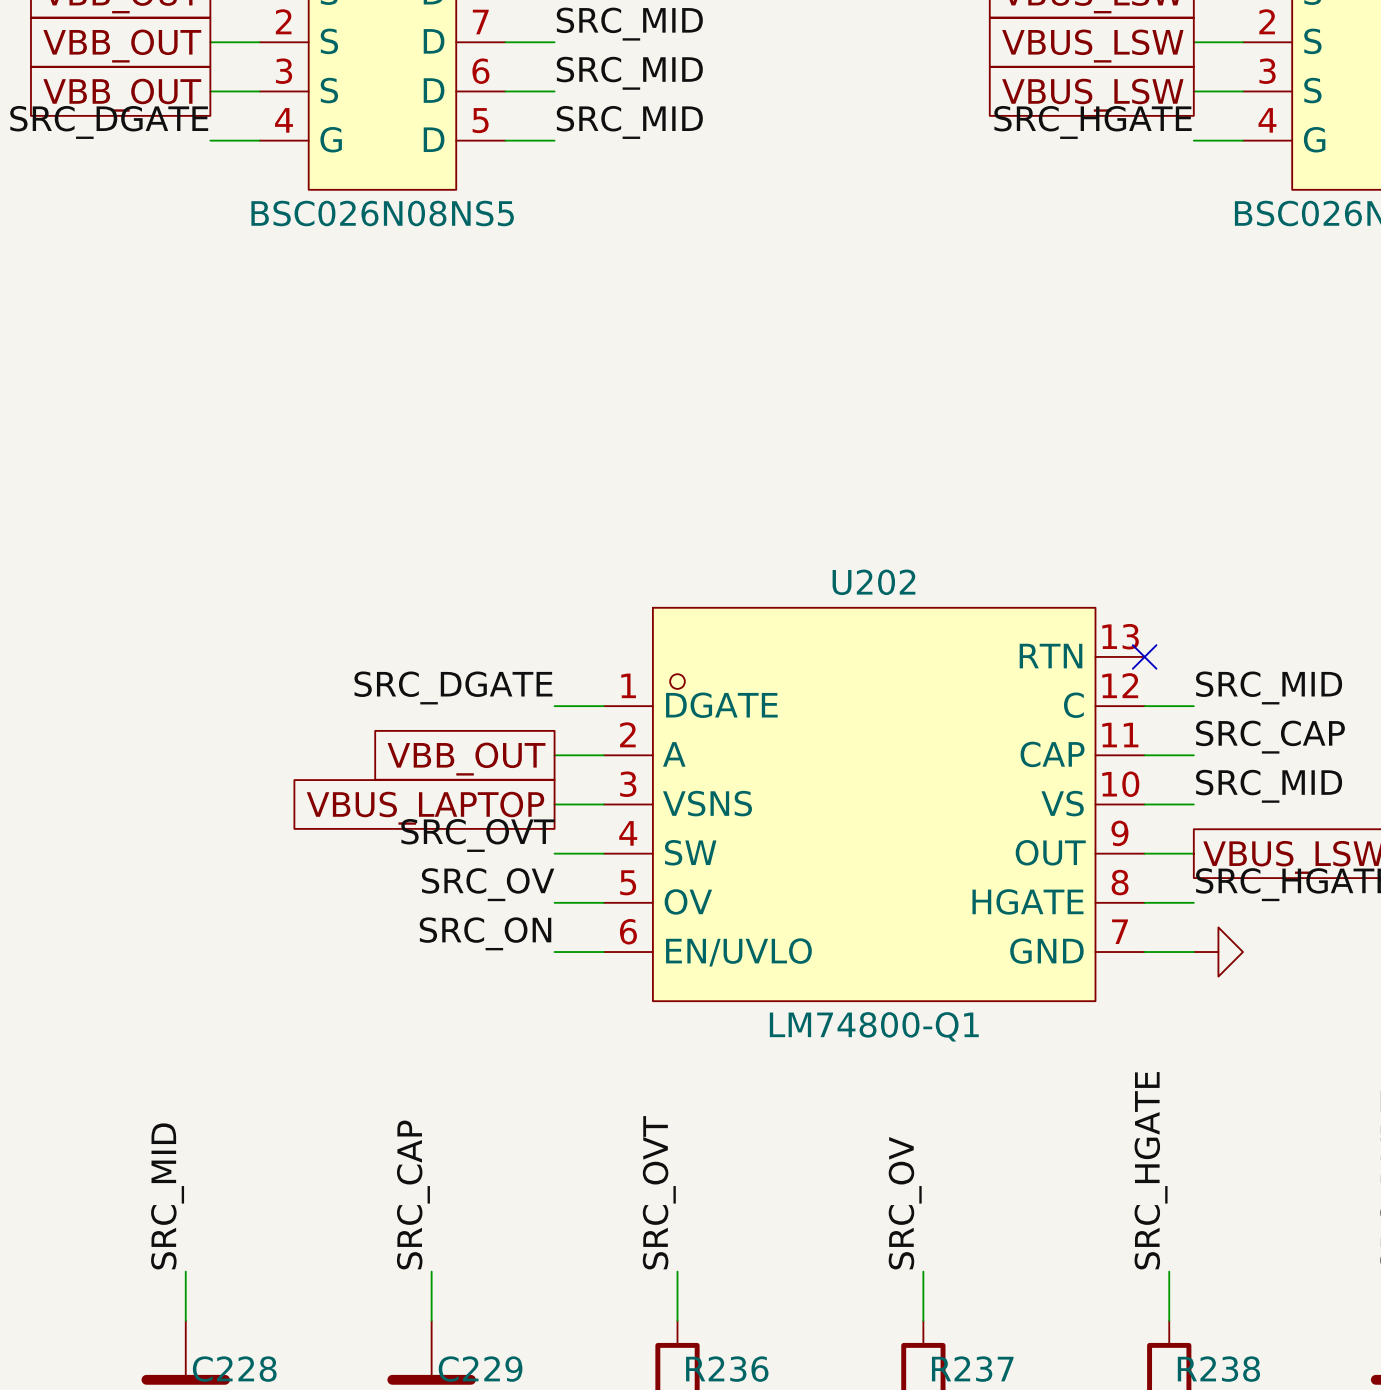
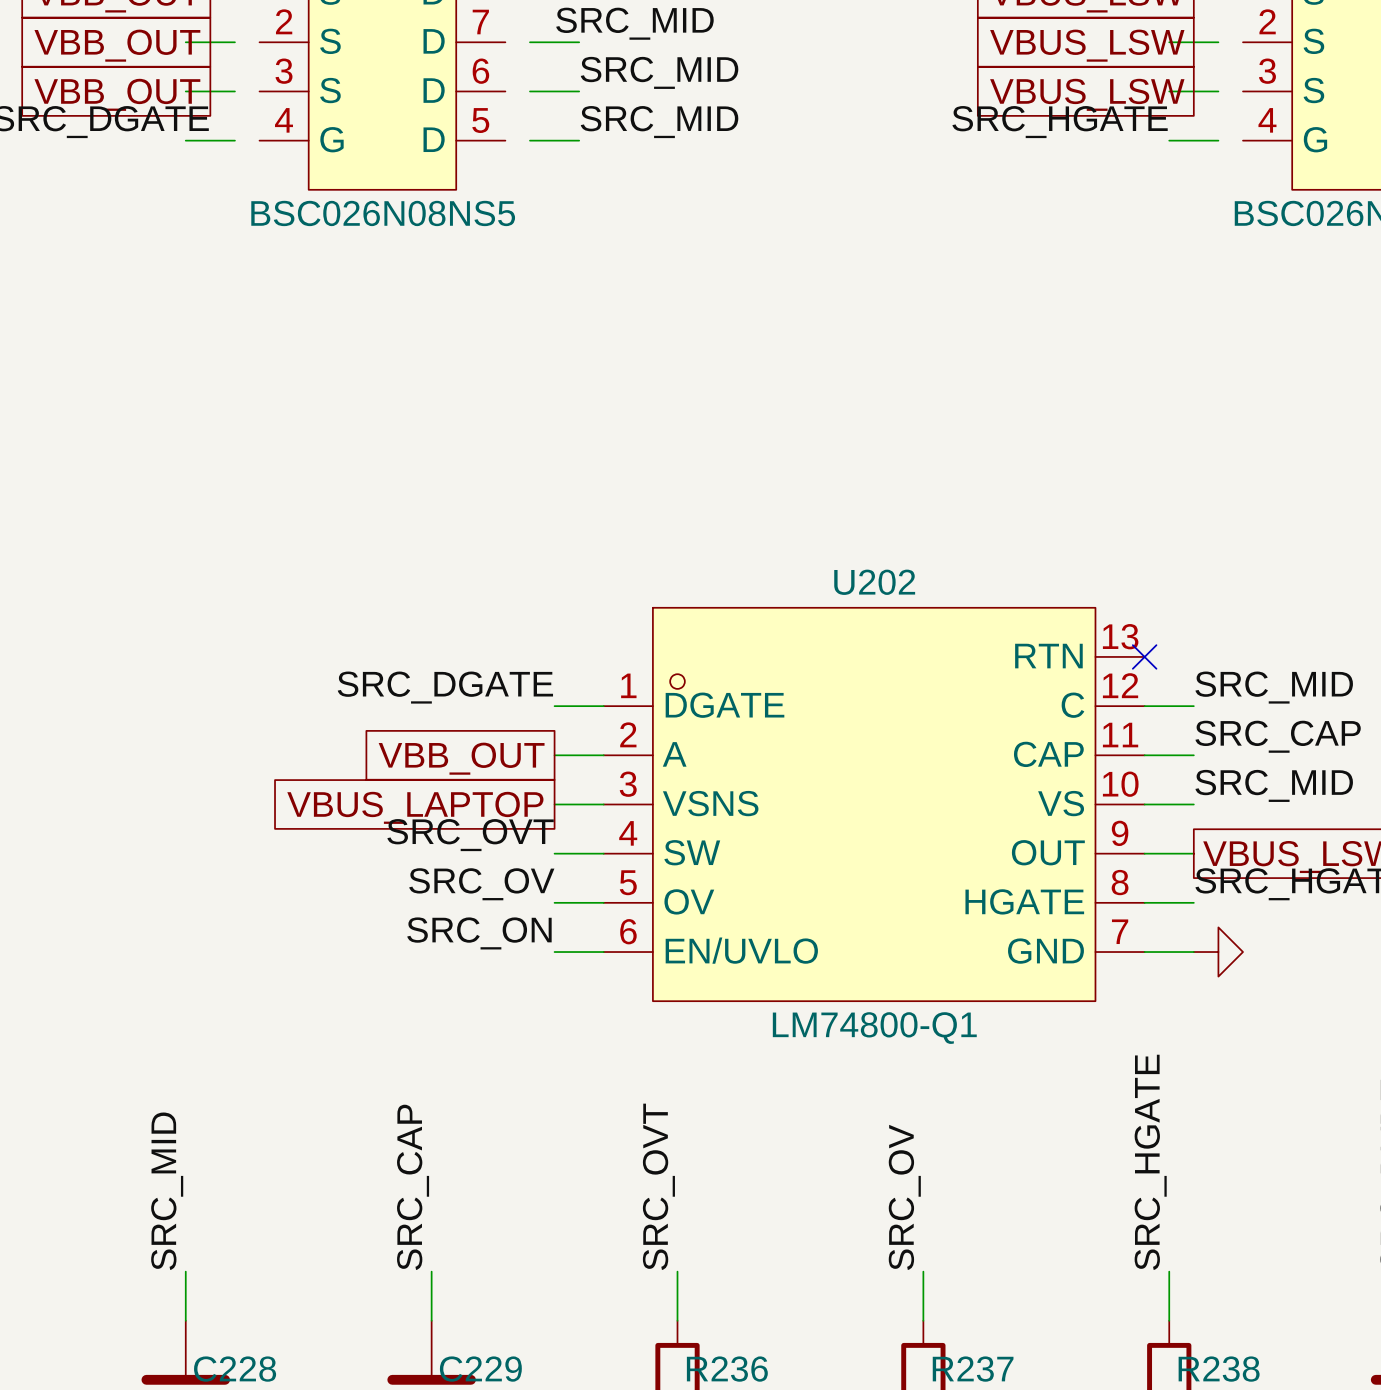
wire: (234, 42) (259, 42) -> (185, 42) (210, 42)
wire: (505, 42) (529, 42) -> (554, 42) (579, 42)
wire: (1218, 42) (1243, 42) -> (1169, 42) (1193, 42)
label position: SRC_MID (629, 73) -> SRC_MID (659, 72)
wire: (234, 91) (259, 91) -> (185, 91) (210, 91)
wire: (505, 91) (529, 91) -> (554, 91) (579, 91)
wire: (1218, 91) (1243, 91) -> (1169, 91) (1193, 91)
label position: SRC_MID (629, 122) -> SRC_MID (659, 122)
label position: SRC_HGATE (1093, 122) -> SRC_HGATE (1060, 122)
wire: (234, 140) (259, 140) -> (185, 140) (210, 140)
wire: (505, 140) (529, 140) -> (554, 140) (579, 140)
wire: (1218, 140) (1243, 140) -> (1169, 140) (1193, 140)

